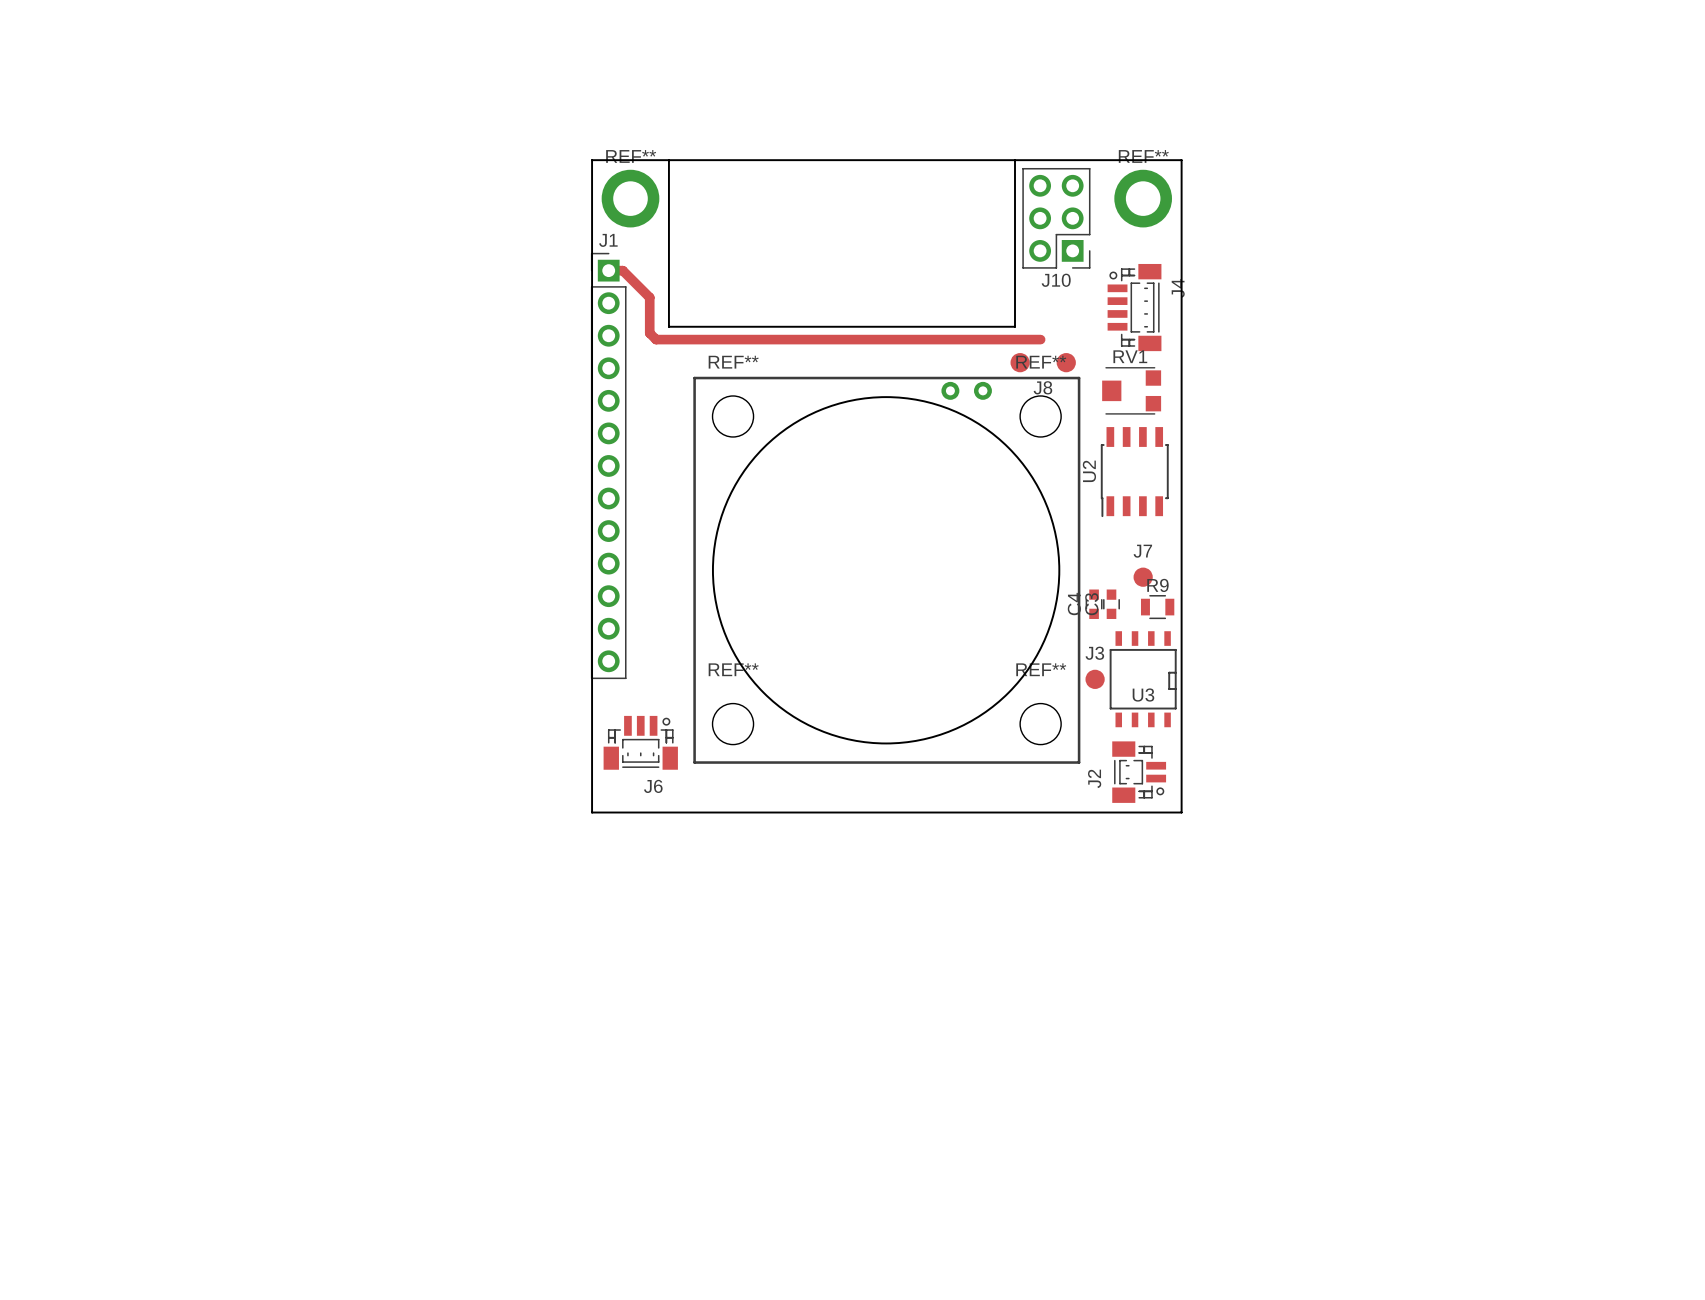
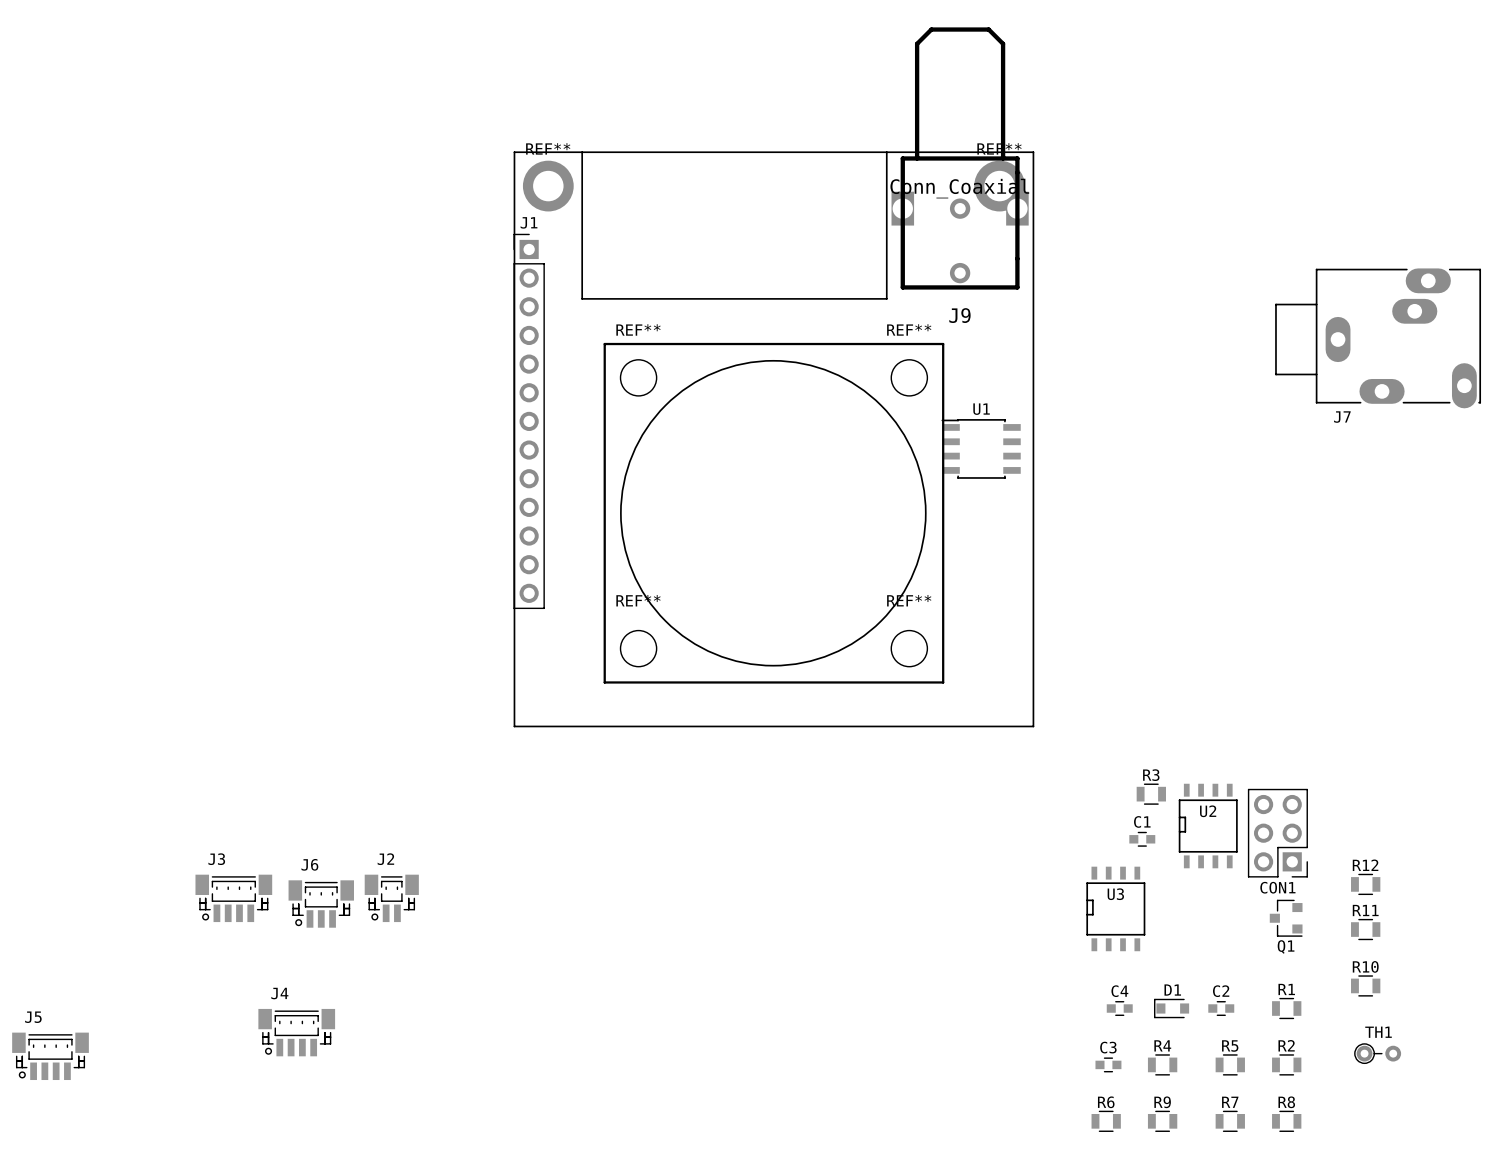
J9: none -> Conn_Coaxial (960, 158)
J10: (1056, 218) -> none
track: (608, 270) (622, 270) (649, 297) (649, 333) (656, 339) (1040, 339) -> none
J4 rotation: 0° (1134, 307) -> 90° counterclockwise (296, 1032)
J4 position: (1134, 307) -> (296, 1032)
J8: (1043, 362) -> none
part: (966, 390) -> none
RV1: (1131, 390) -> none
U2 footprint: [1100, 427, 1169, 518] -> [1178, 783, 1238, 869]
U2 name position: U2 (1089, 471) -> U2 (1208, 811)
U1: none -> (981, 448)
J7 name position: J7 (1142, 551) -> J7 (1342, 417)
J7 footprint: [1133, 567, 1153, 587] -> [1275, 268, 1482, 409]
C4 rotation: 0° (1094, 604) -> 90° clockwise (1119, 1008)
C4 position: (1094, 604) -> (1119, 1008)
C3 rotation: 0° (1111, 604) -> 90° clockwise (1108, 1064)
C3 position: (1111, 604) -> (1108, 1064)
R9 position: (1157, 607) -> (1162, 1121)
J3 name position: J3 (1094, 653) -> J3 (216, 859)
J3 footprint: [1085, 669, 1105, 689] -> [195, 874, 273, 923]
U3 rotation: 0° (1143, 679) -> 180° (1115, 908)
U3 position: (1143, 679) -> (1115, 908)
J6 rotation: 0° (640, 742) -> 180° (321, 904)
J6 position: (640, 742) -> (321, 904)
J2 rotation: 0° (1139, 772) -> 90° clockwise (391, 898)
J2 position: (1139, 772) -> (391, 898)
R3: none -> (1151, 794)
CON1: none -> (1277, 833)
C1: none -> (1142, 839)
R12: none -> (1365, 884)
Q1: none -> (1286, 918)
R11: none -> (1365, 929)
R10: none -> (1365, 985)
D1: none -> (1171, 1008)
C2: none -> (1221, 1008)
R1: none -> (1286, 1008)
TH1: none -> (1377, 1053)
J5: none -> (50, 1056)
R4: none -> (1162, 1064)
R5: none -> (1230, 1064)
R2: none -> (1286, 1064)
R6: none -> (1106, 1121)
R7: none -> (1230, 1121)
R8: none -> (1286, 1121)

